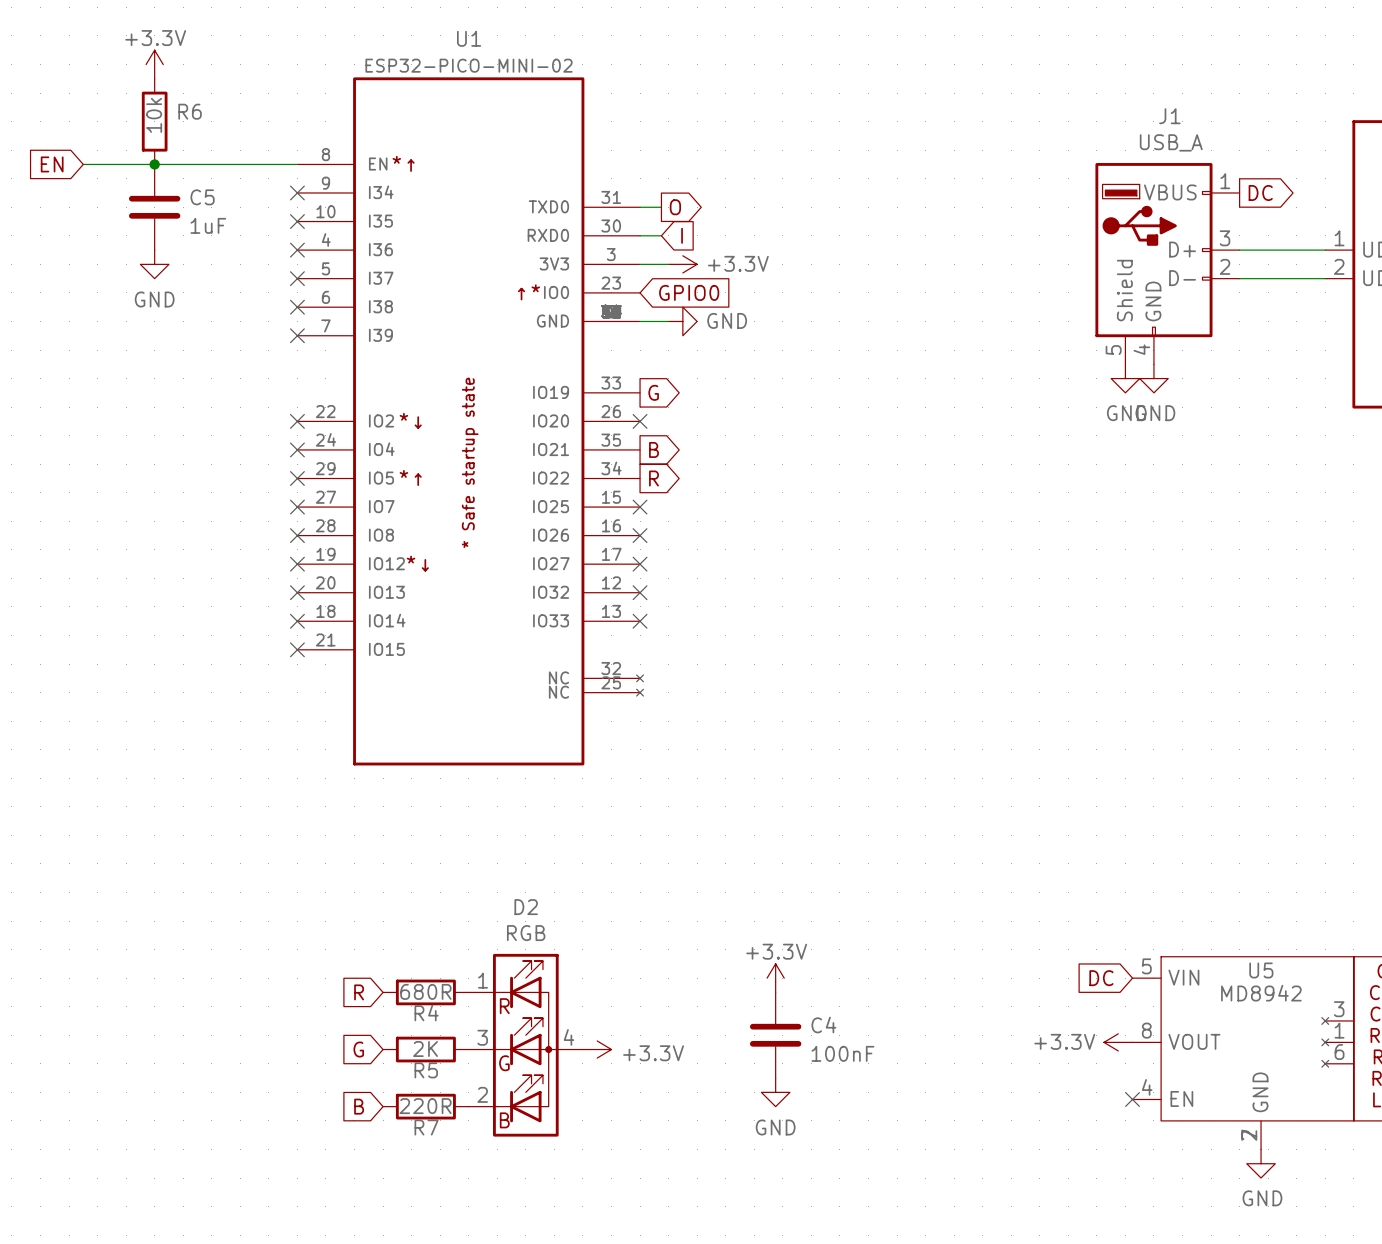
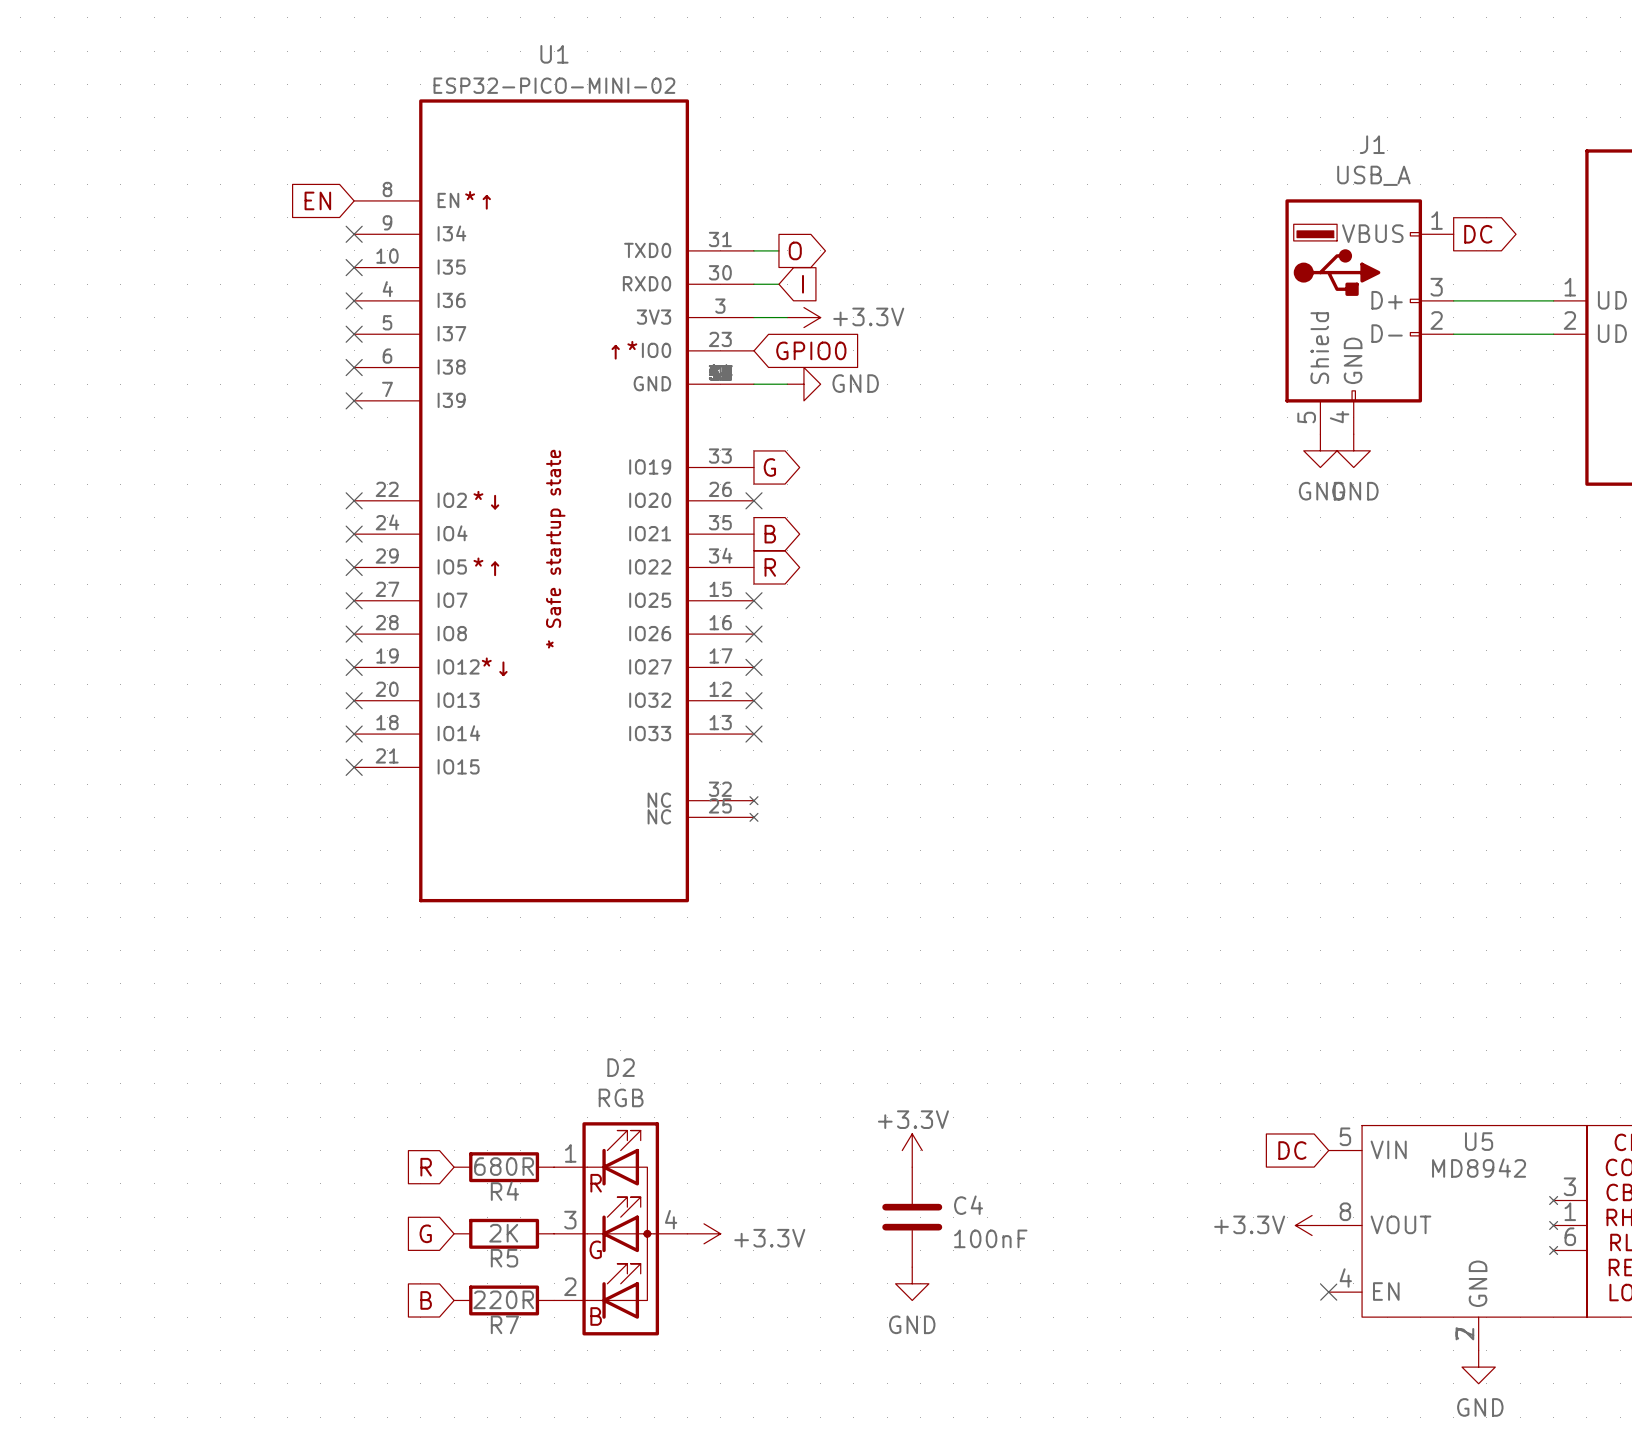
power symbol: +3.3V (154, 64) -> none
R6: 10k (154, 121) -> none
global label position: EN (52, 164) -> EN (317, 200)
wire: (83, 164) (297, 164) -> none
junction: (154, 164) -> none
C5: 1uF (154, 207) -> none
power symbol: GND (154, 264) -> none

